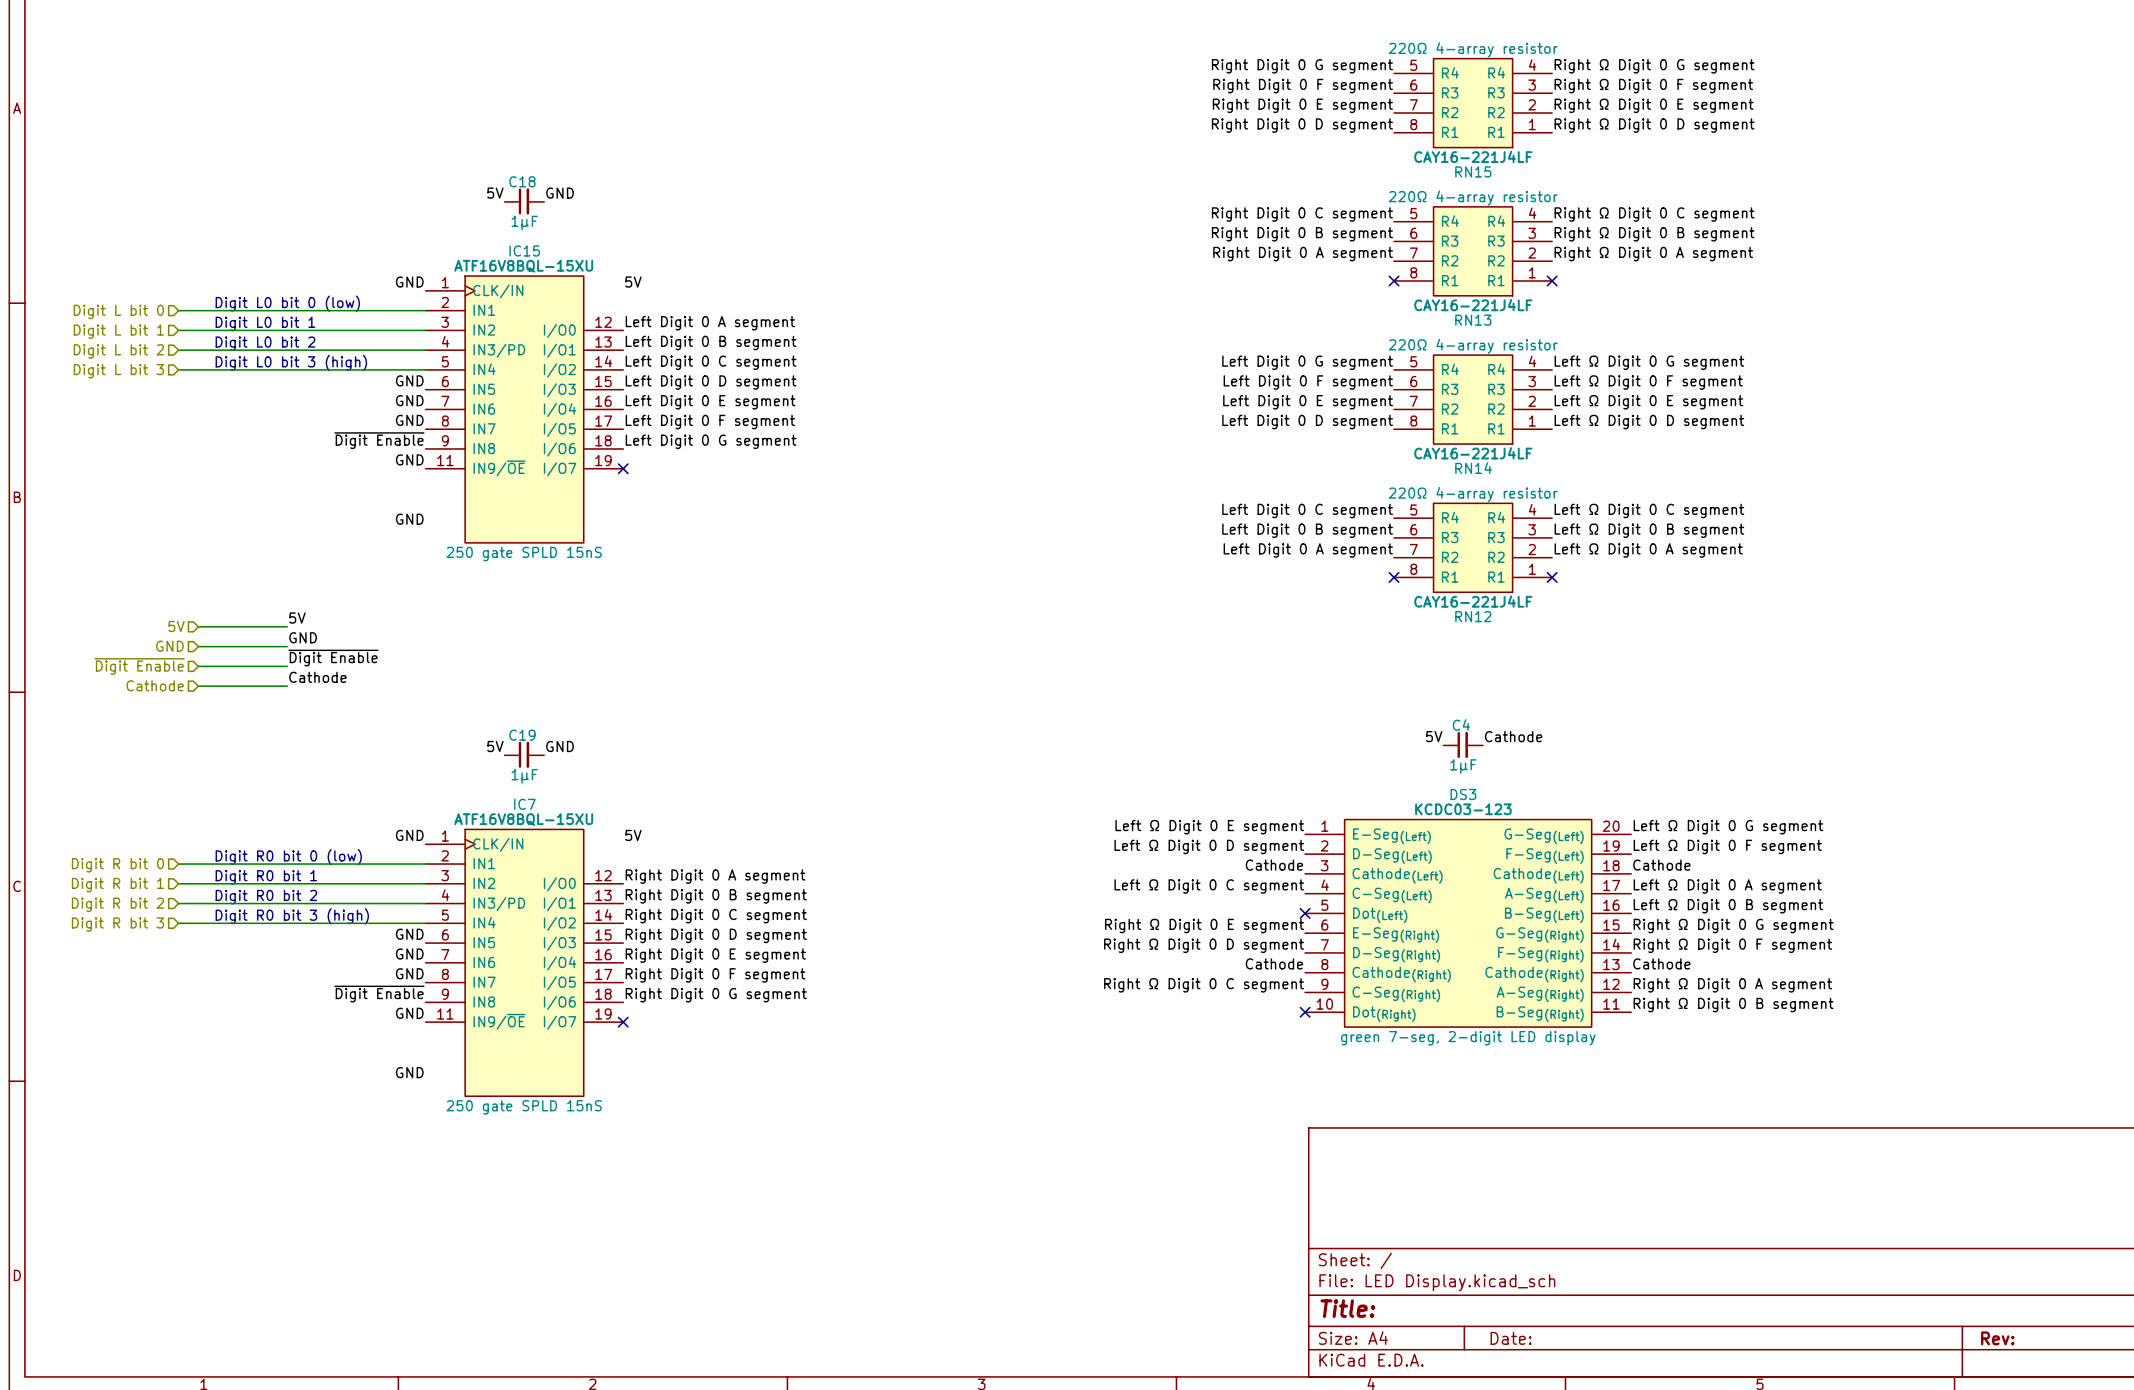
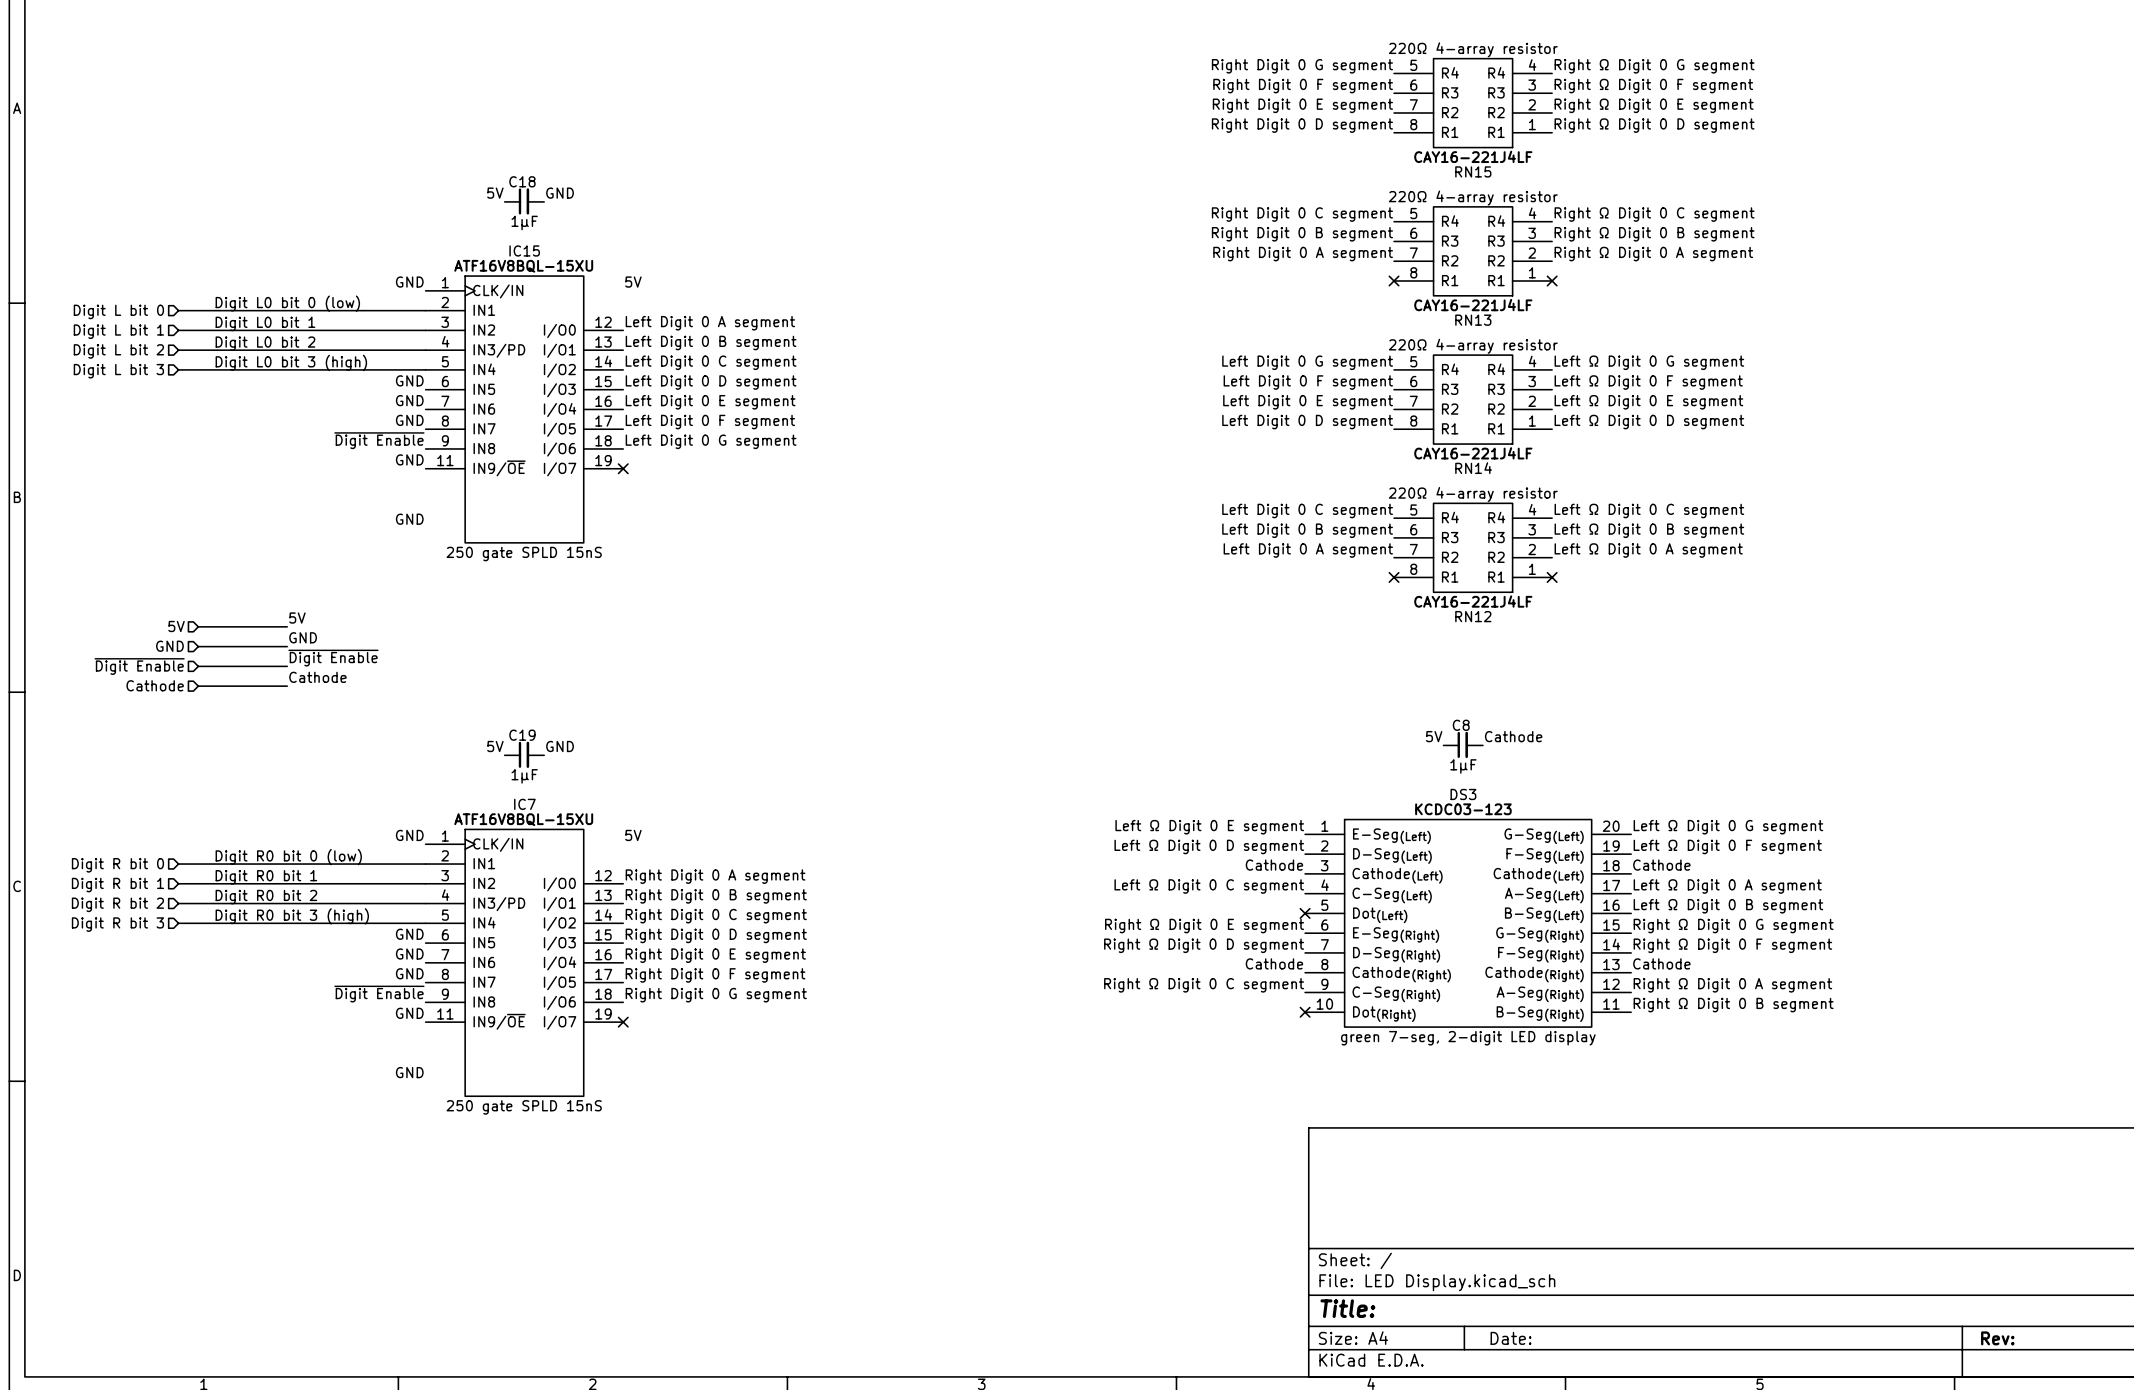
C4 name: C4 (1461, 725) -> C8 (1461, 725)

